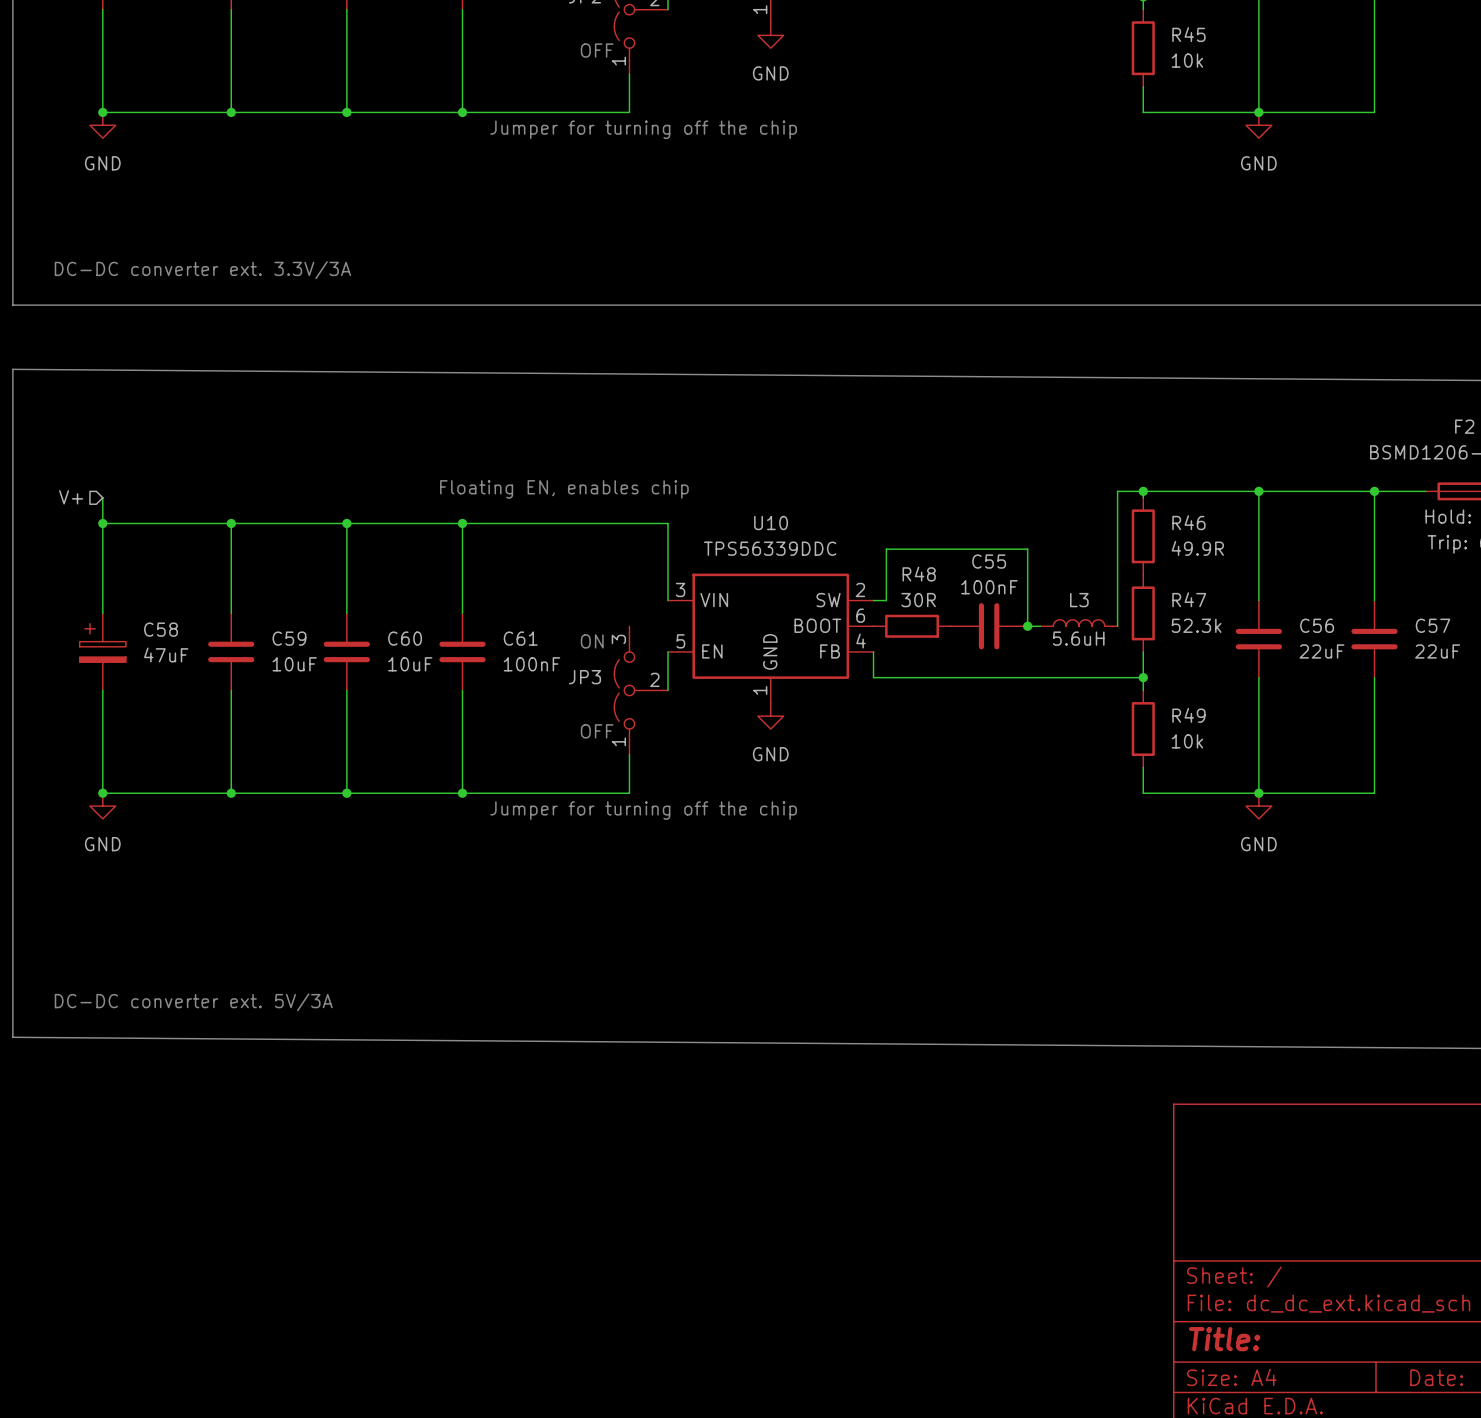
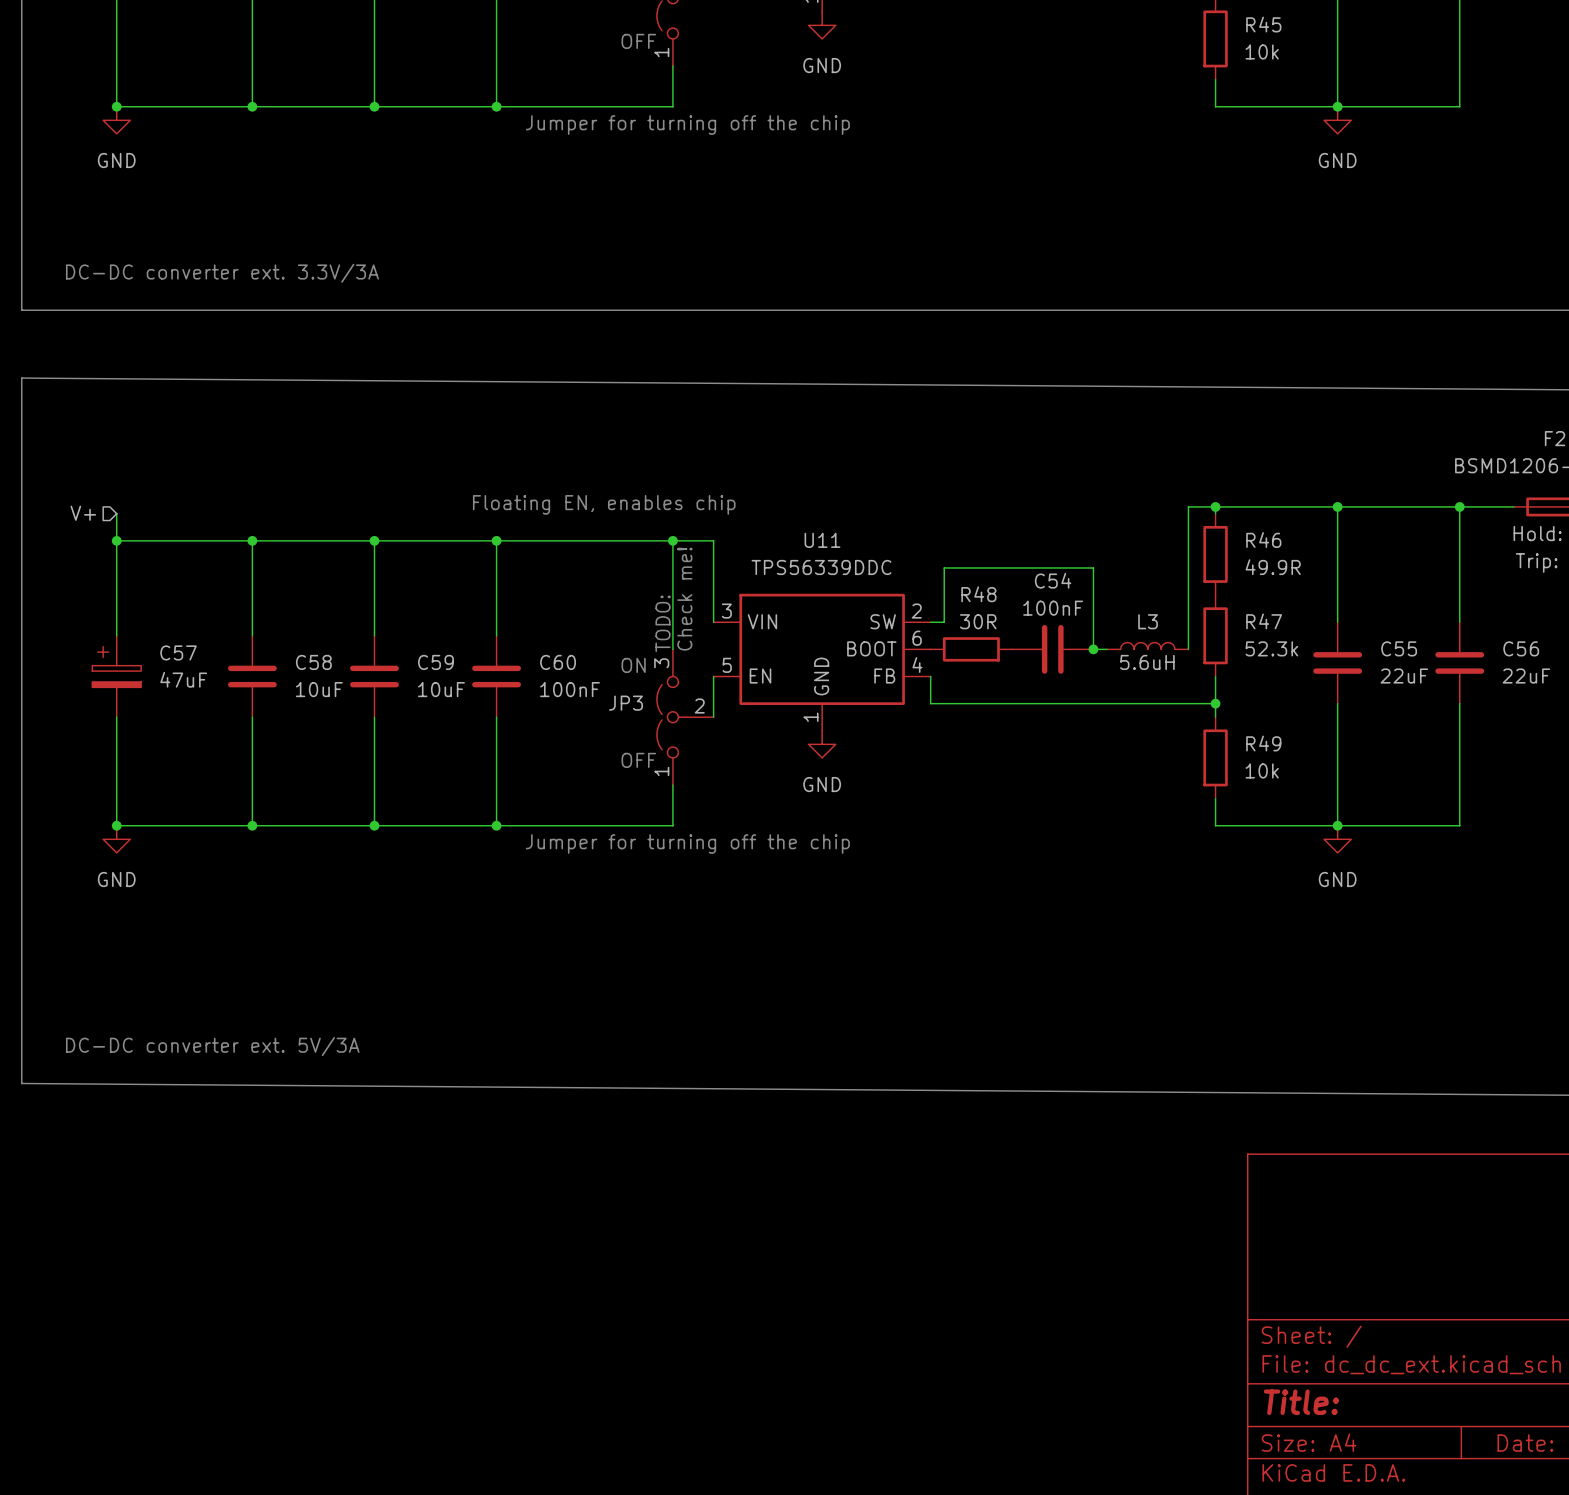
wire: none -> (672, 540) (672, 649)
junction: none -> (672, 540)
U10 name: U10 (771, 523) -> U11 (822, 540)
C55 name: C55 (989, 561) -> C54 (1053, 580)
text: none -> Check me! (684, 599)
text: none -> TODO: (662, 623)
C56 name: C56 (1317, 625) -> C55 (1399, 648)
C57 name: C57 (1433, 625) -> C56 (1521, 648)
C58 name: C58 (161, 629) -> C57 (178, 652)
C59 name: C59 (289, 638) -> C58 (313, 662)
C60 name: C60 (405, 638) -> C59 (435, 662)
C61 name: C61 (520, 638) -> C60 (558, 662)

